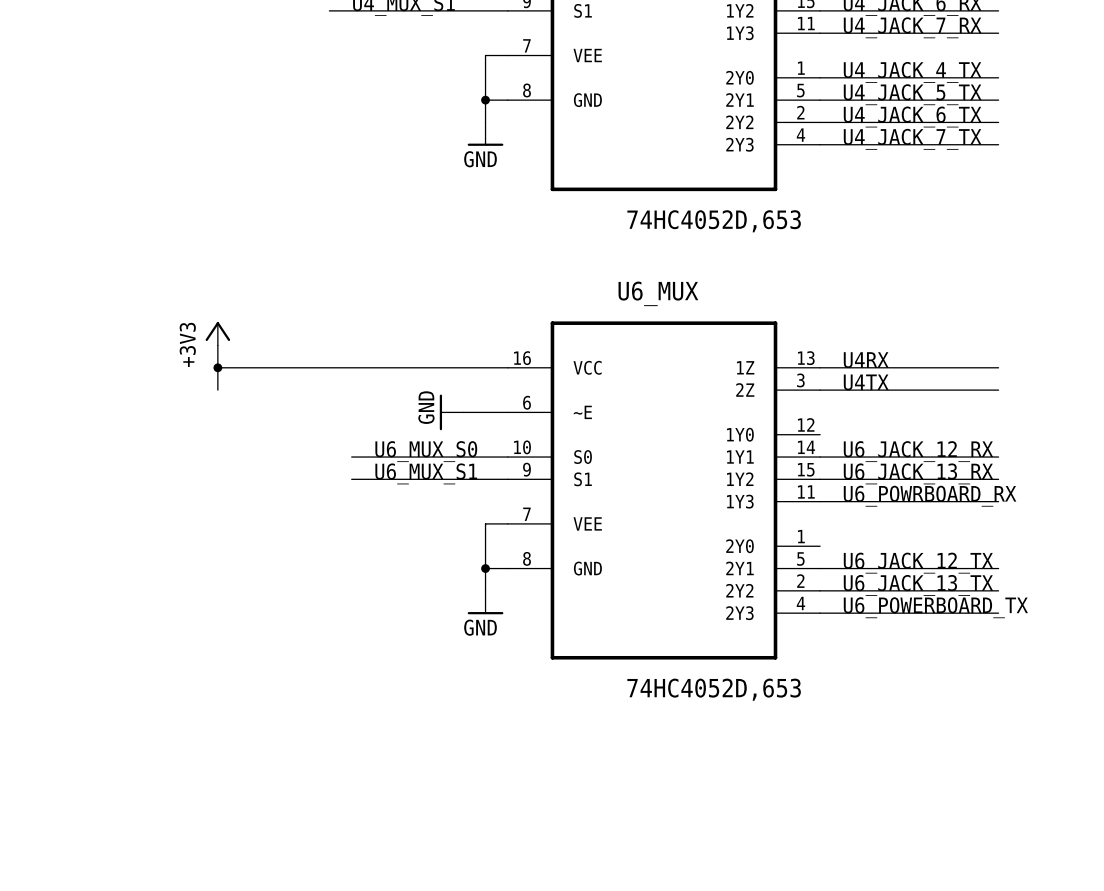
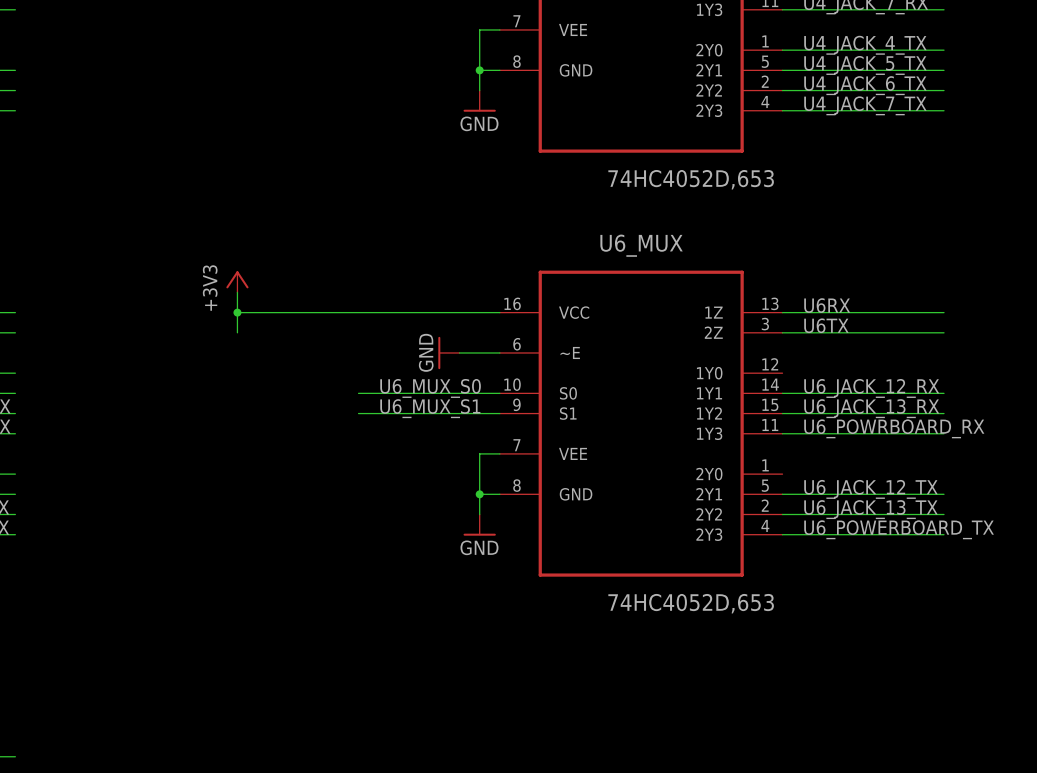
label: U4RX (866, 360) -> U6RX (827, 305)
label: U4TX (866, 382) -> U6TX (826, 325)

